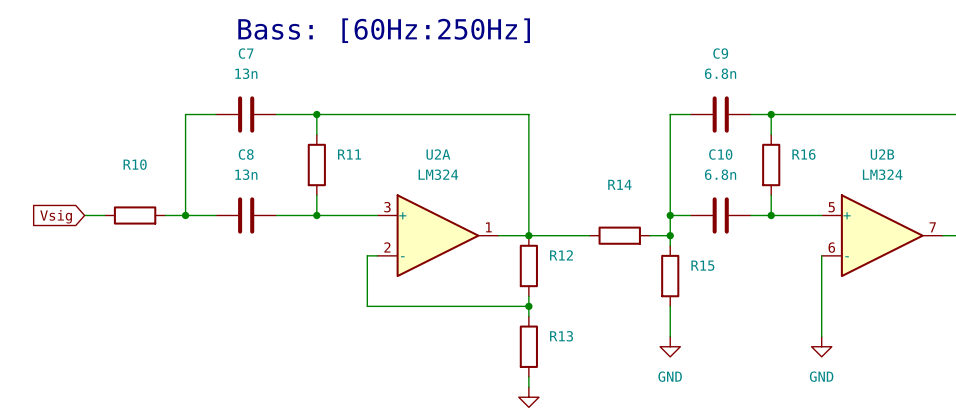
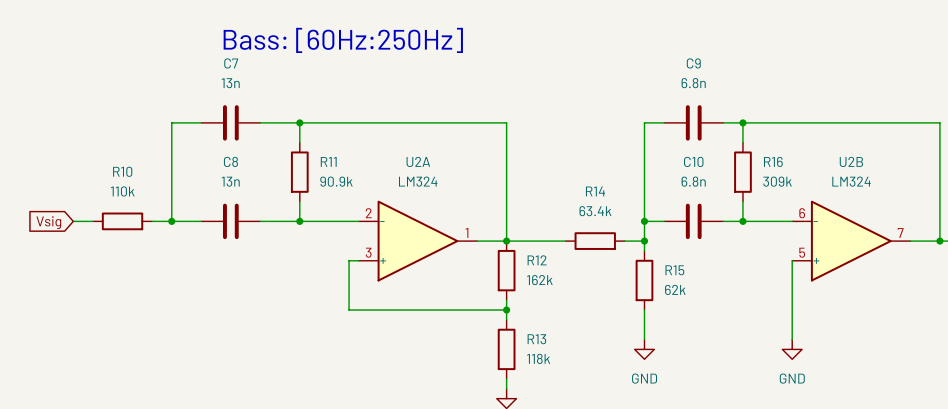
R11 value: none -> 90.9k (336, 181)
R16 value: none -> 309k (777, 181)
R10 value: none -> 110k (122, 191)
R14 value: none -> 63.4k (595, 211)
U2A flip: as is (438, 235) -> up-down (417, 241)
U2B flip: as is (882, 235) -> up-down (851, 241)
R12 value: none -> 162k (539, 280)
R15 value: none -> 62k (675, 289)
R13 value: none -> 118k (538, 358)

